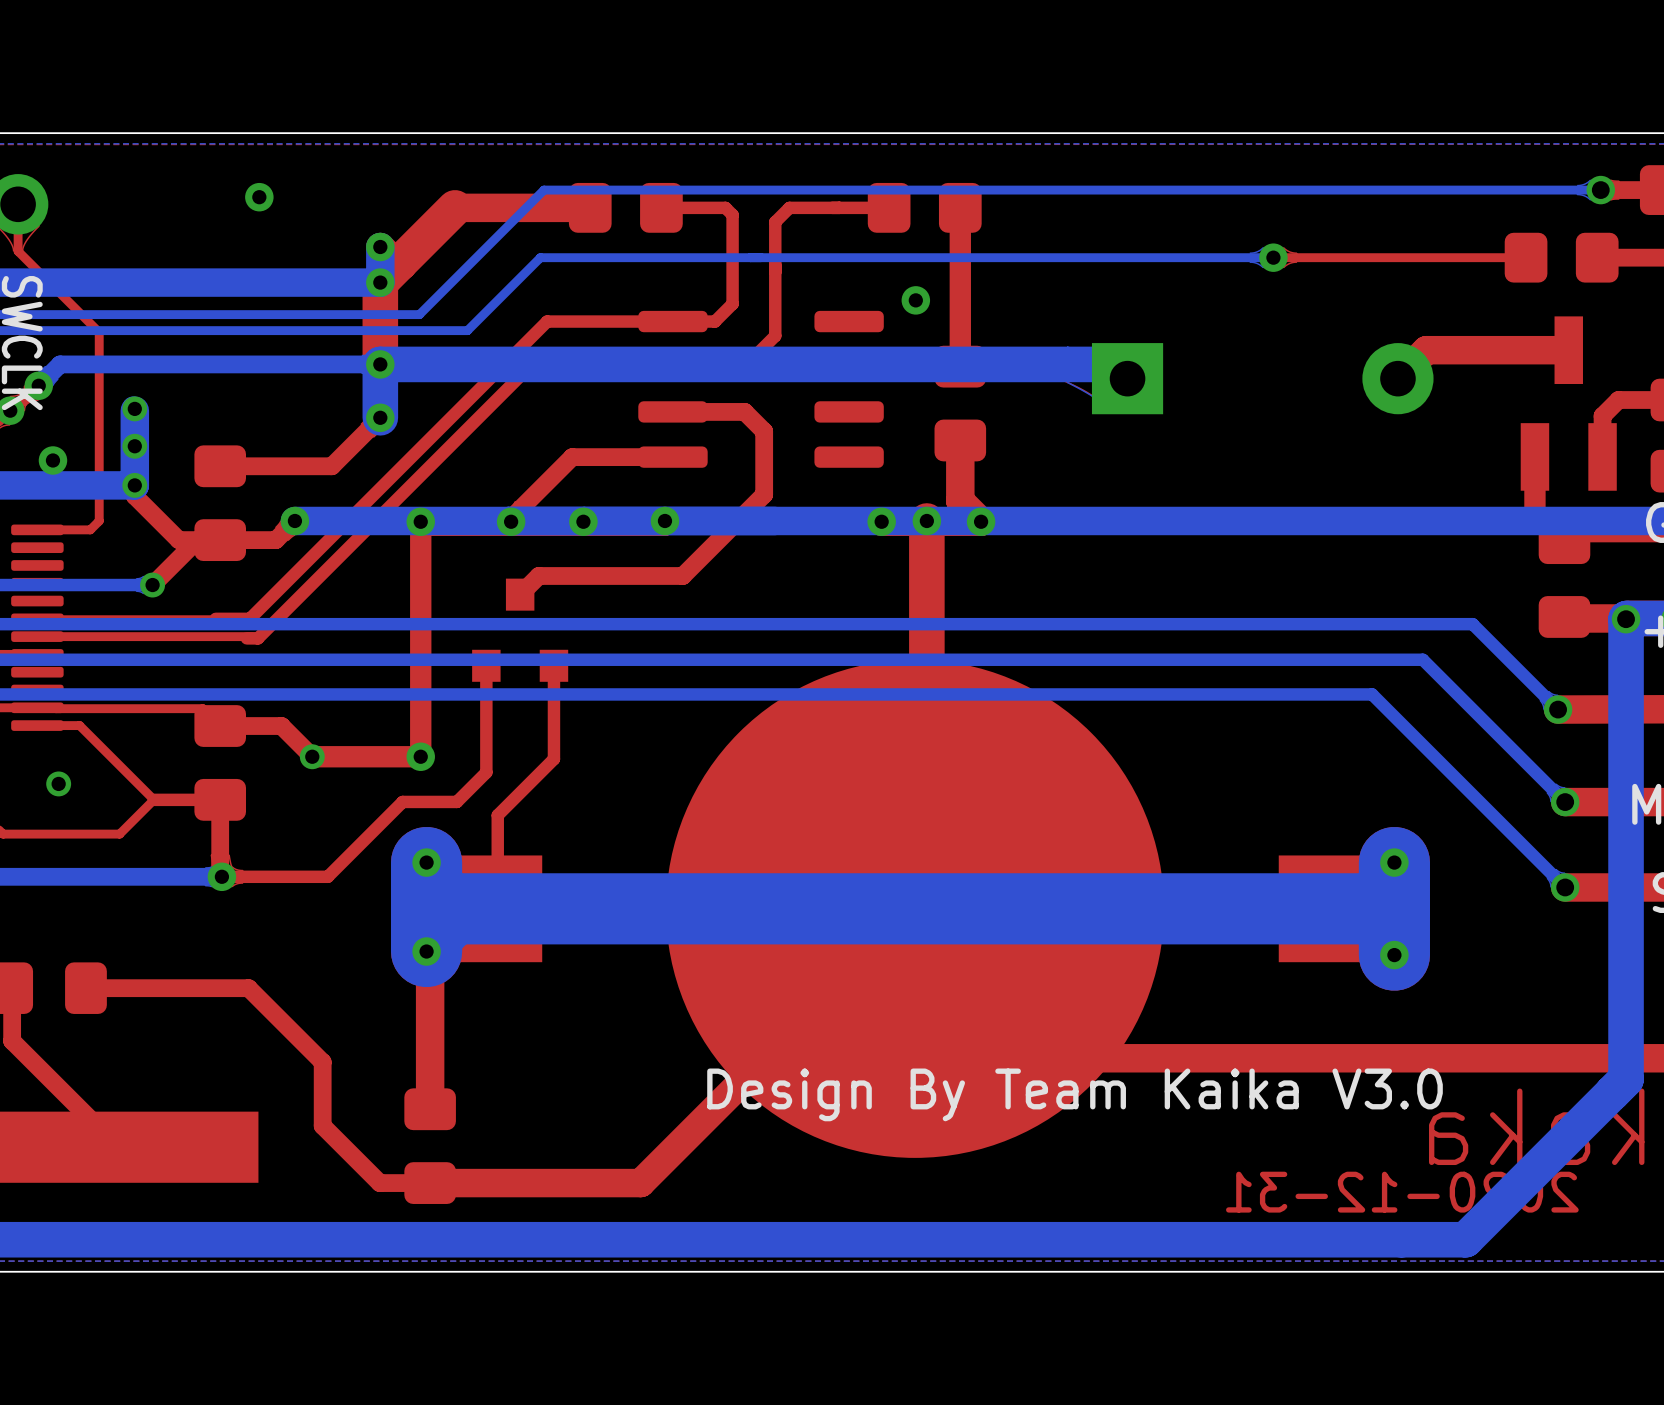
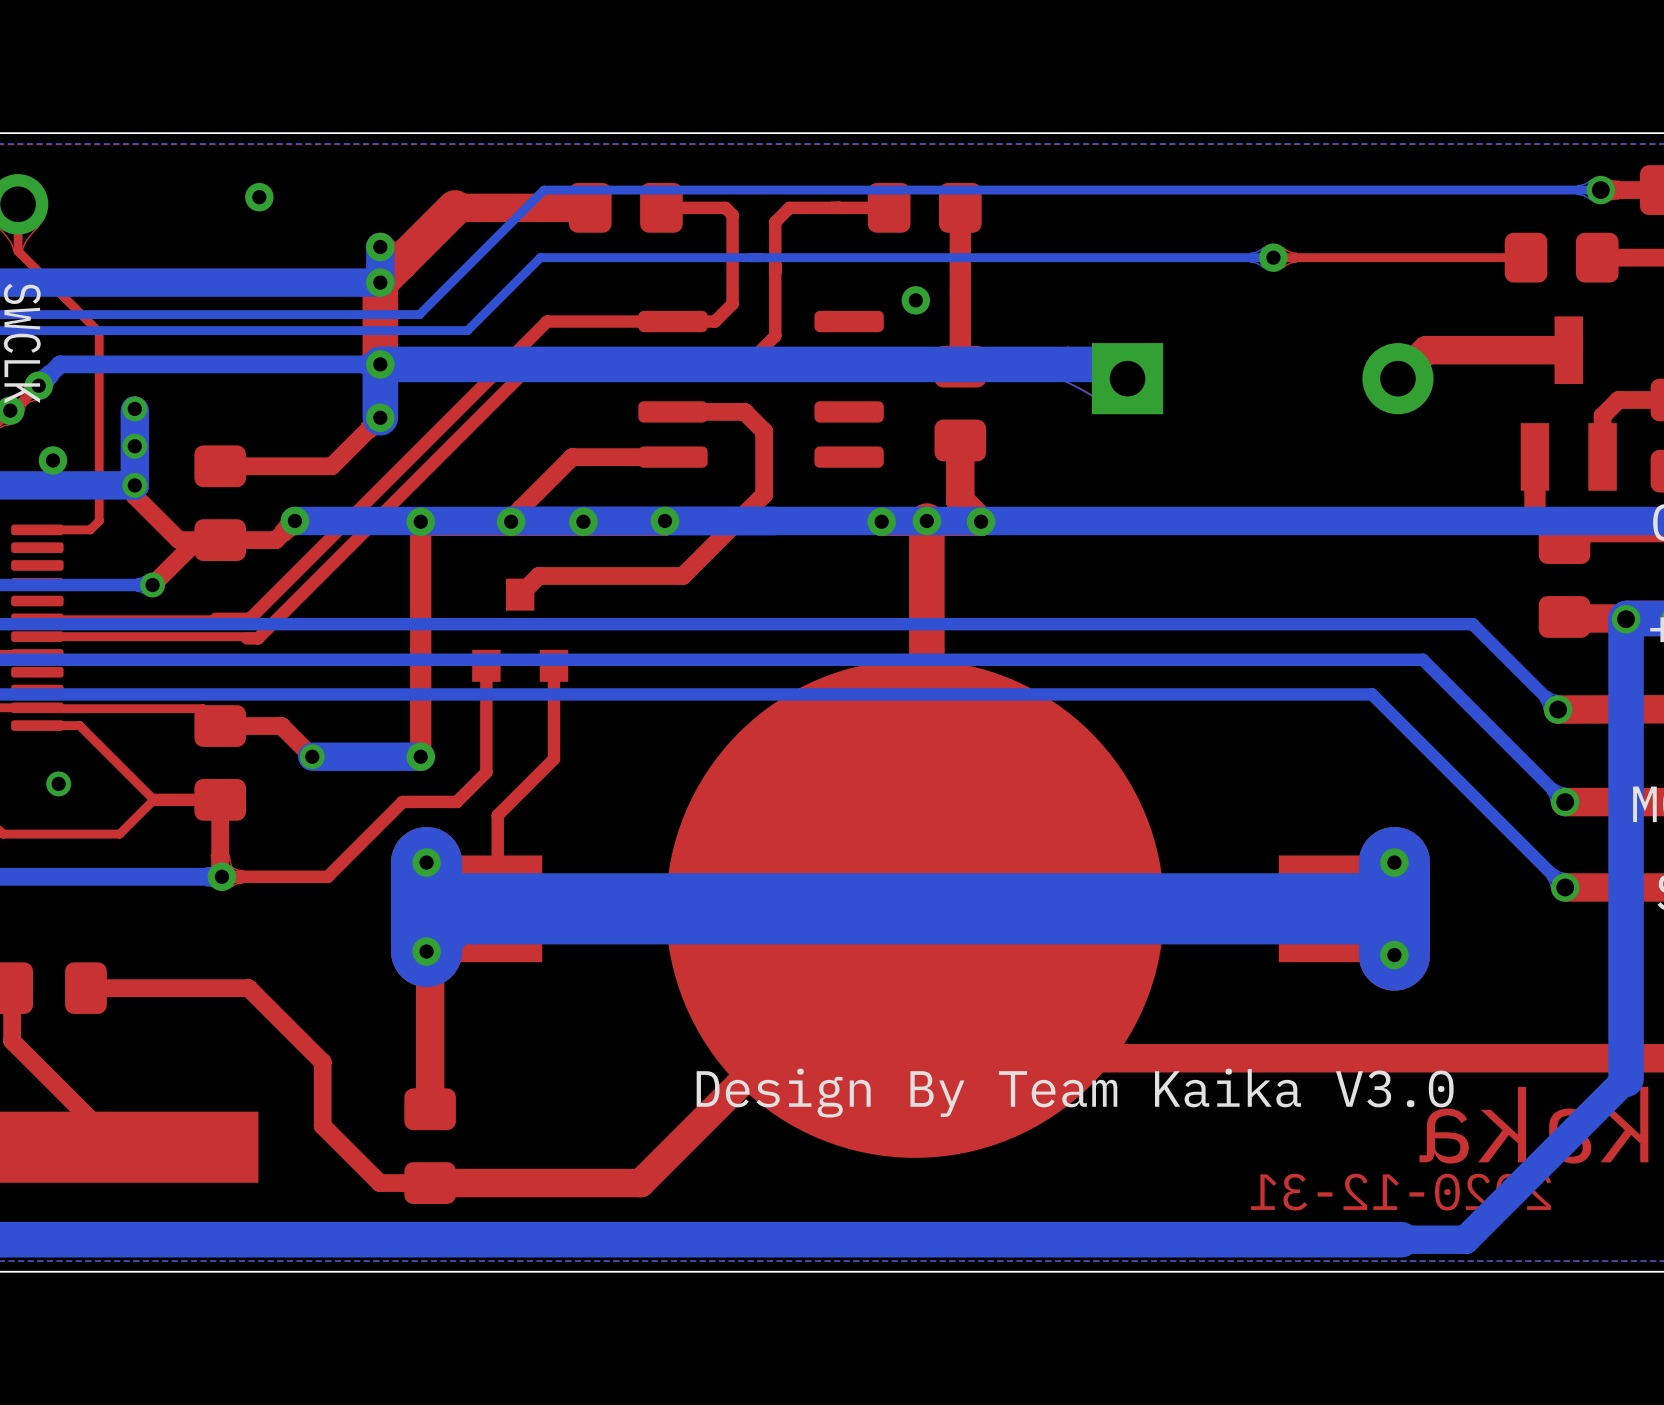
top track: (420, 756) (312, 756) -> none
bottom track: none -> (420, 756) (312, 756)
bottom track width: thick (1626, 1079) (1465, 1239) (1401, 1239) -> thin (1626, 1079) (1465, 1239) (1401, 1239)

